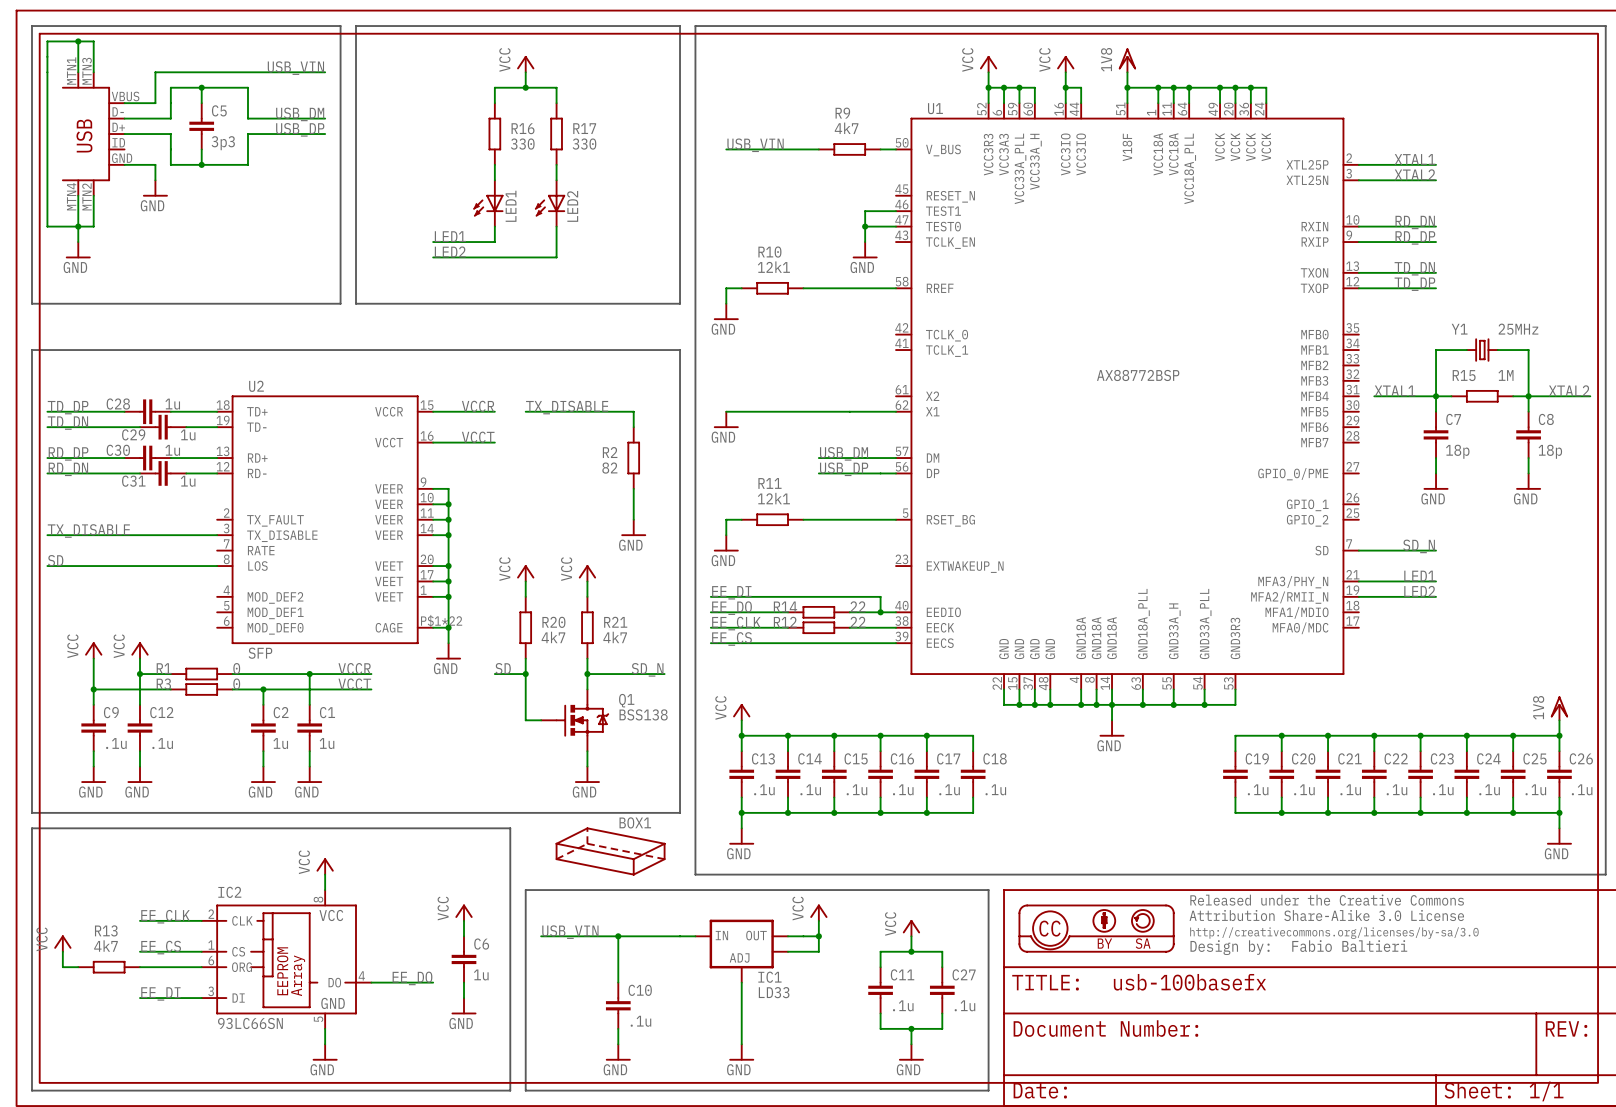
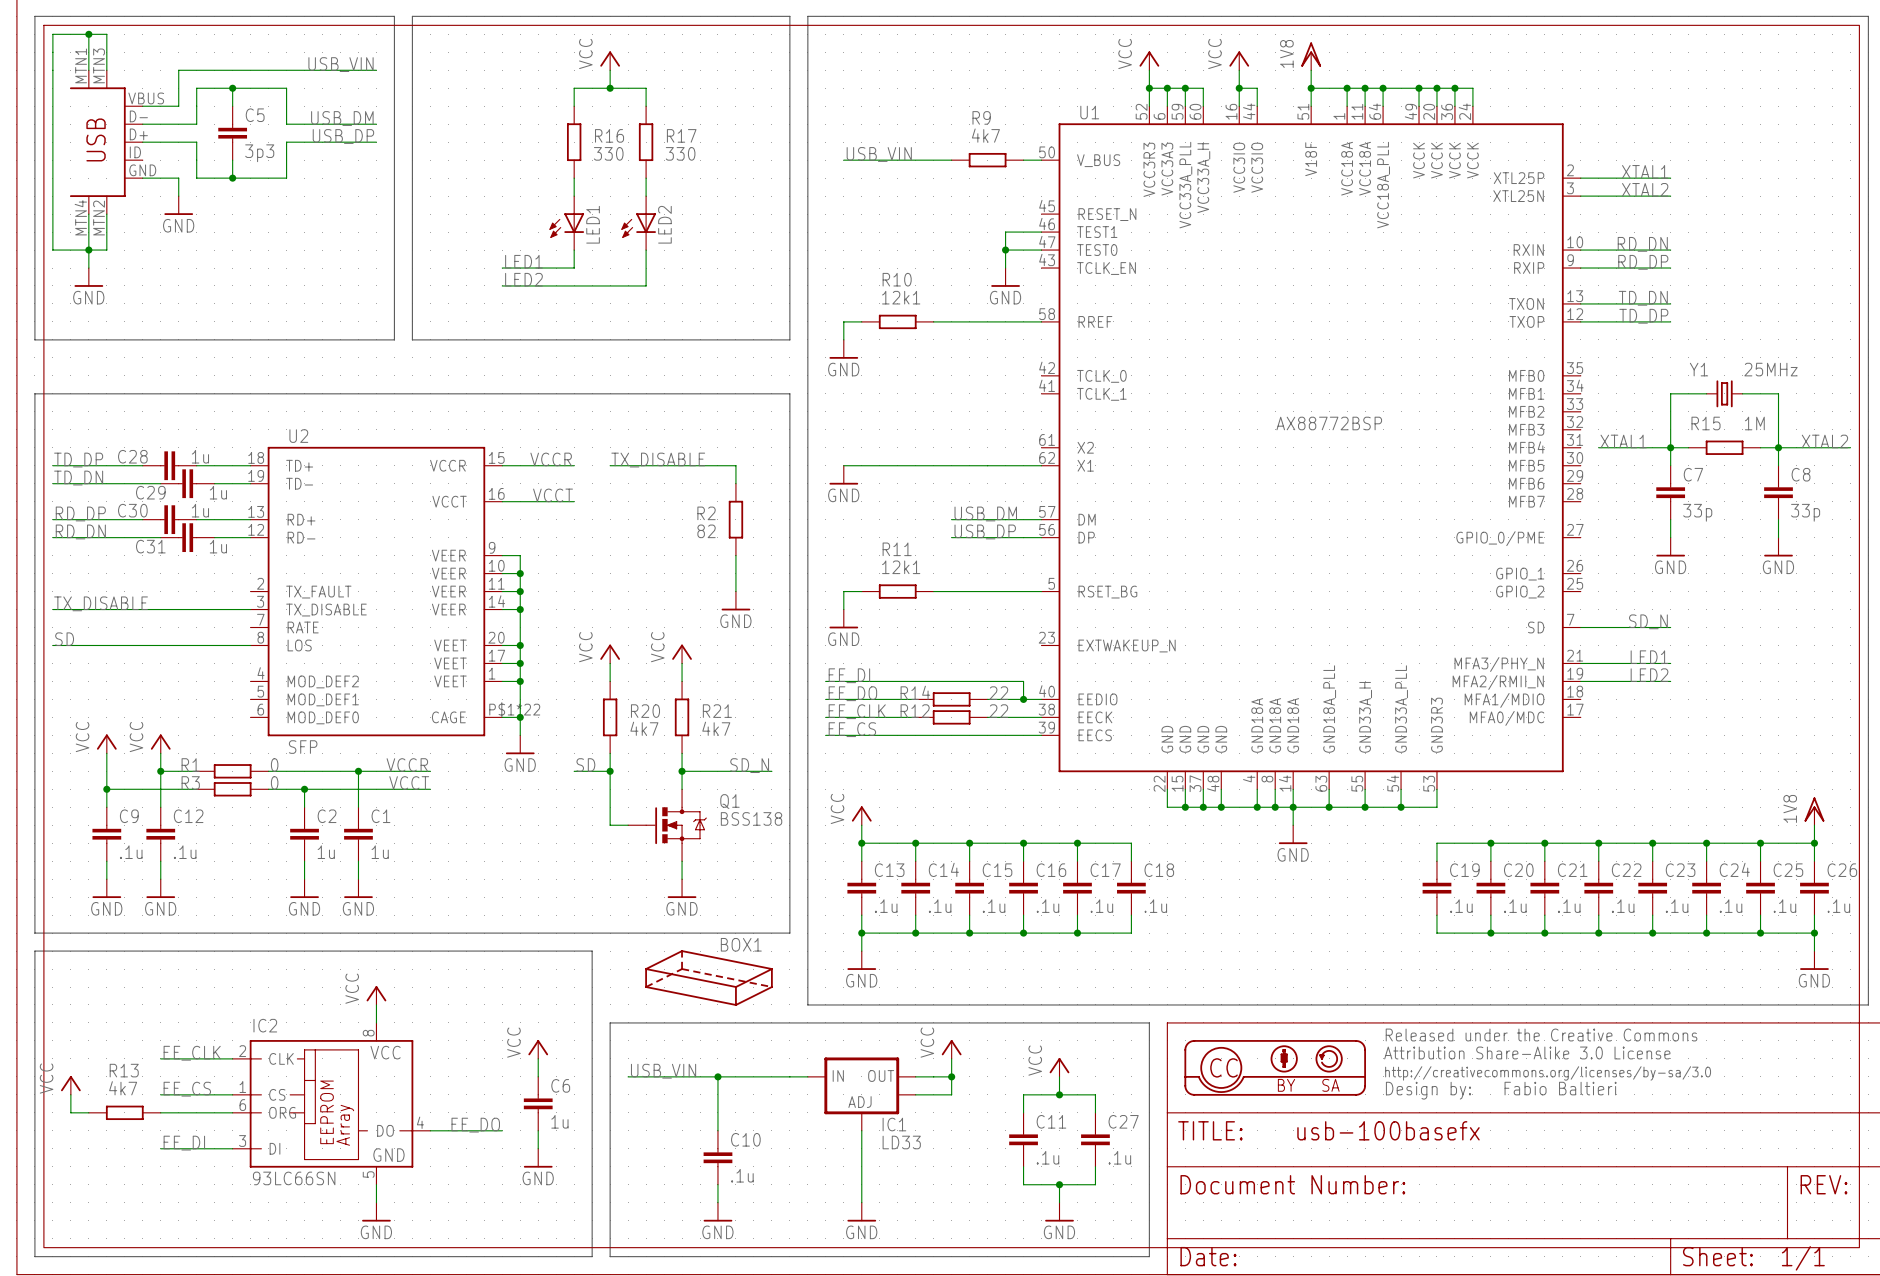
C7 value: 18p (1457, 451) -> 33p (1697, 512)
C8 value: 18p (1550, 451) -> 33p (1805, 512)

